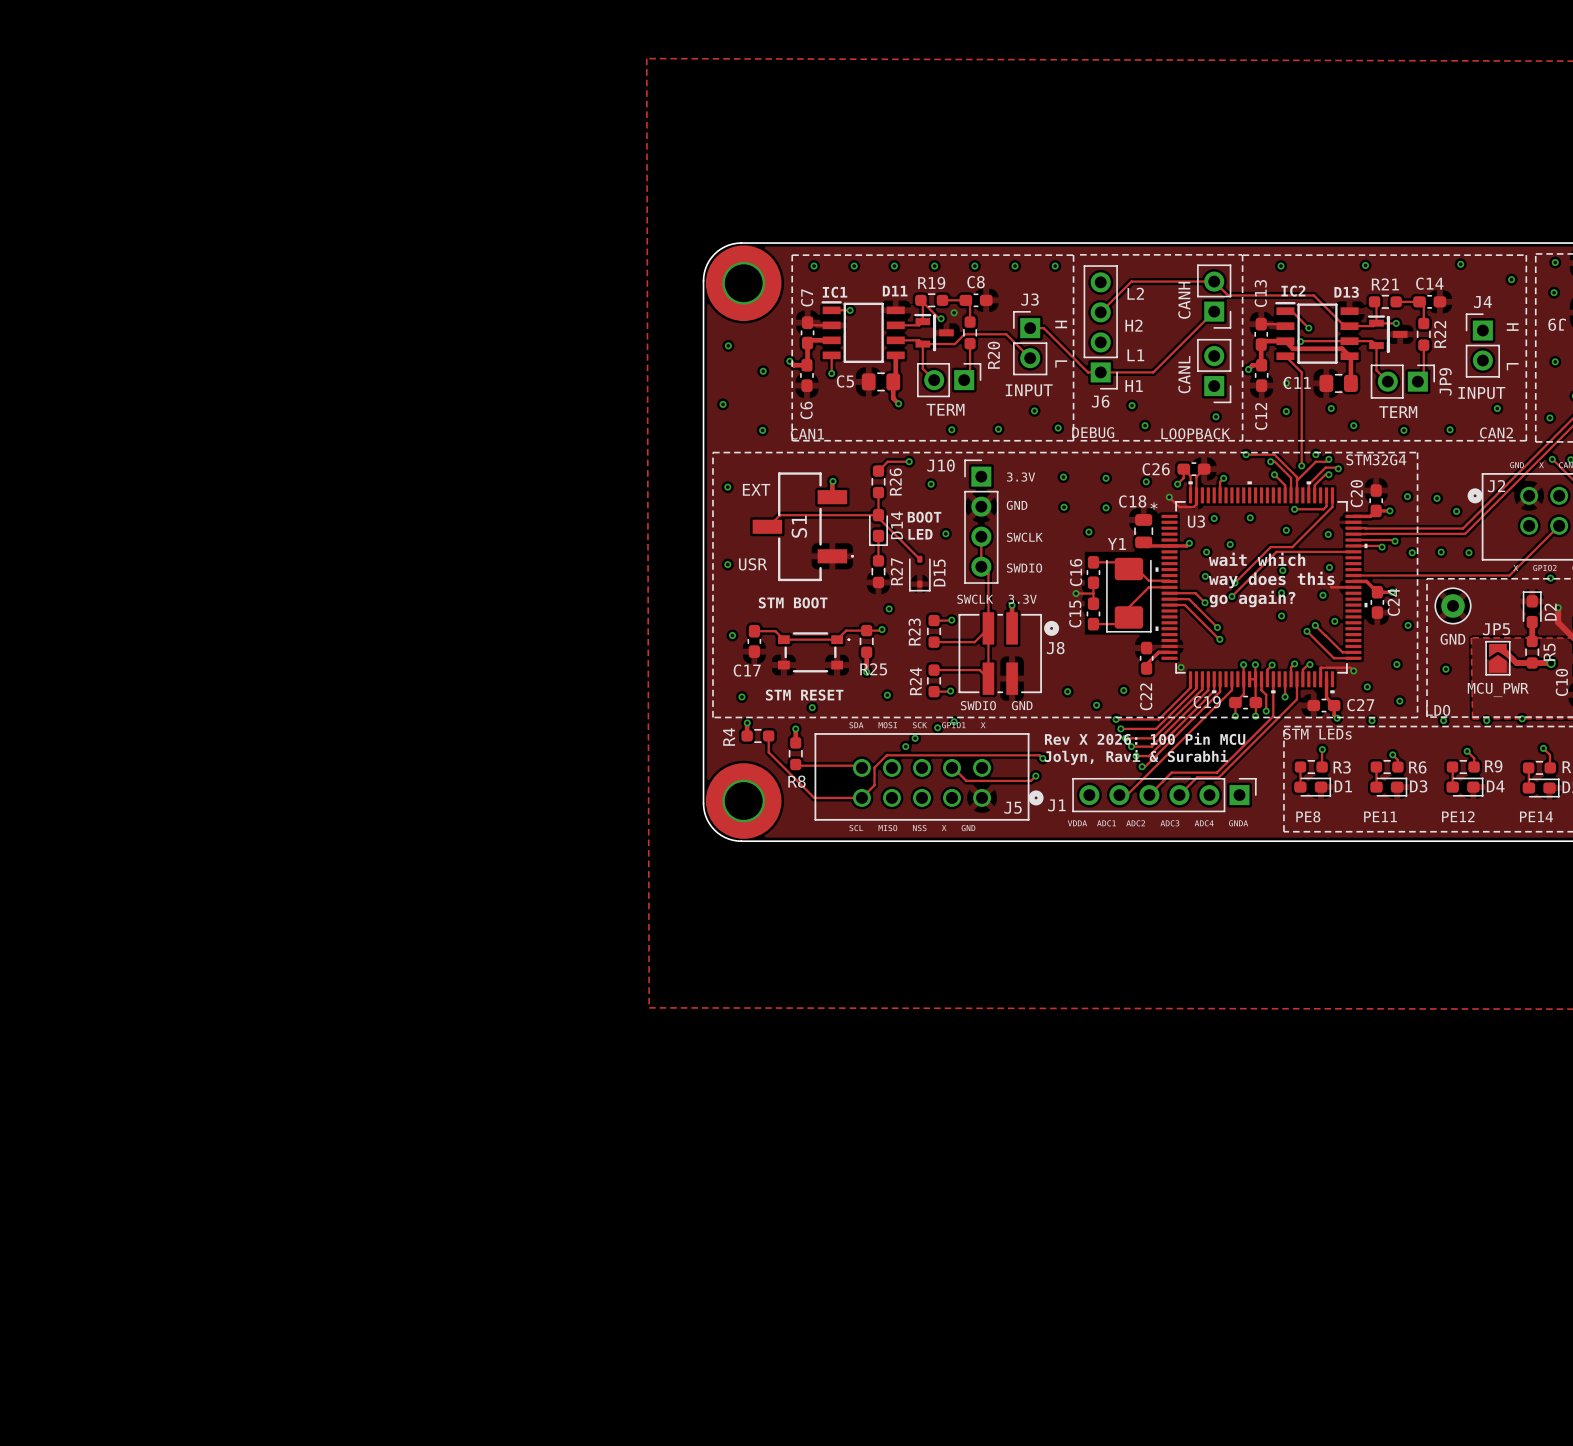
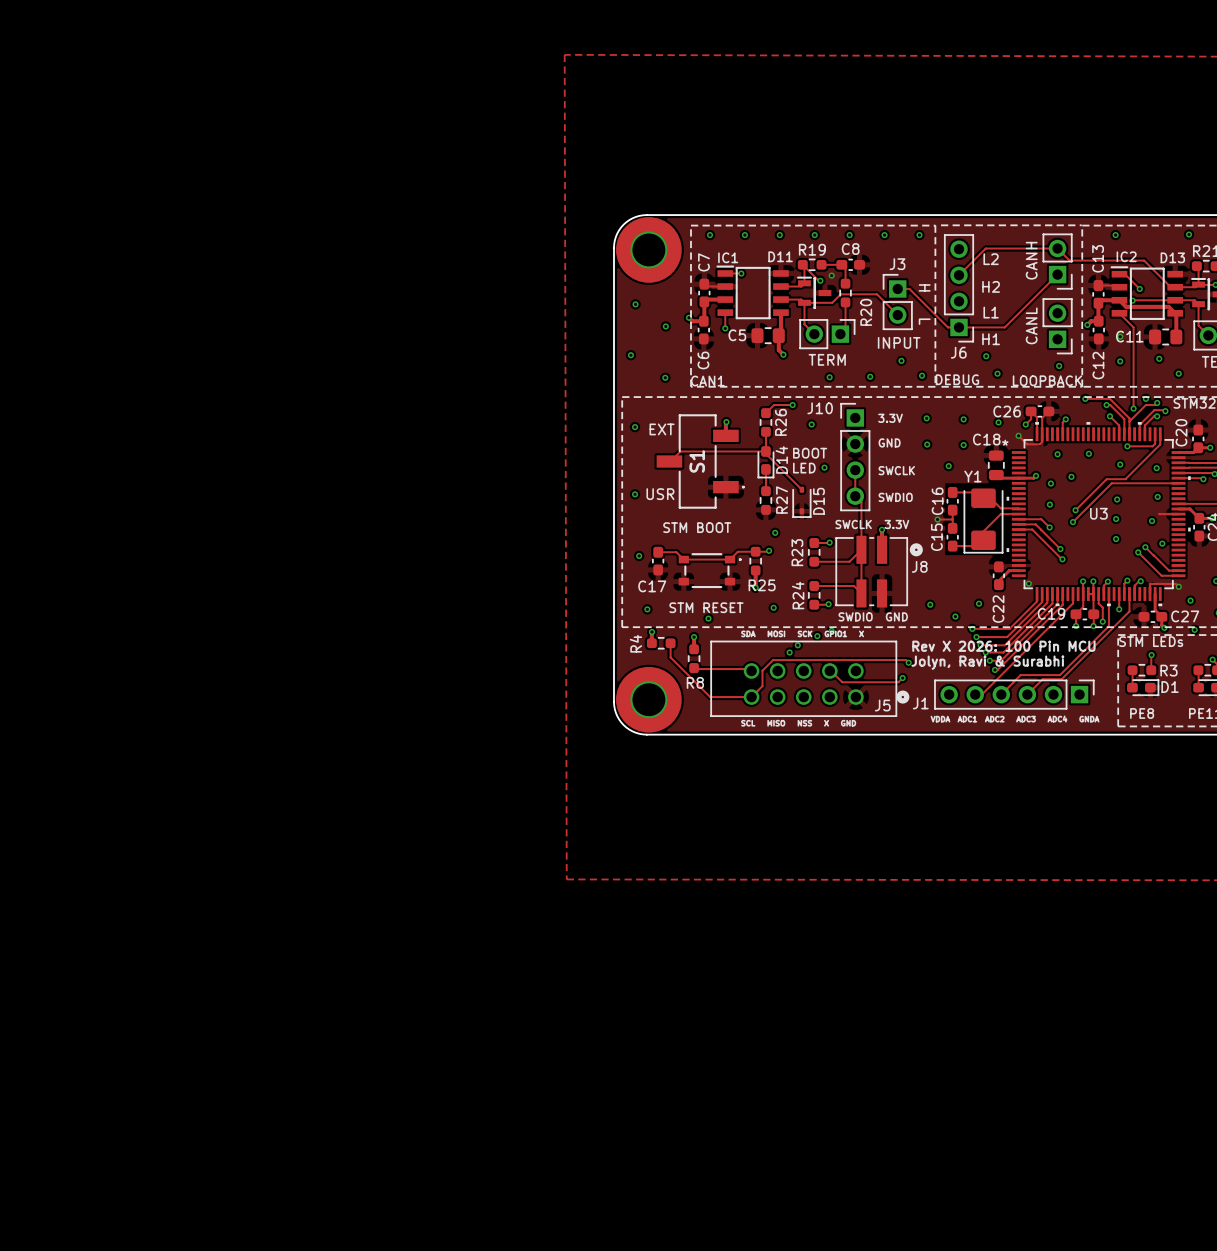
U3 name position: U3 (1196, 521) -> U3 (1098, 513)
text: wait which (1257, 559) -> none
text: way does this (1271, 579) -> none
text: go again? (1252, 599) -> none

